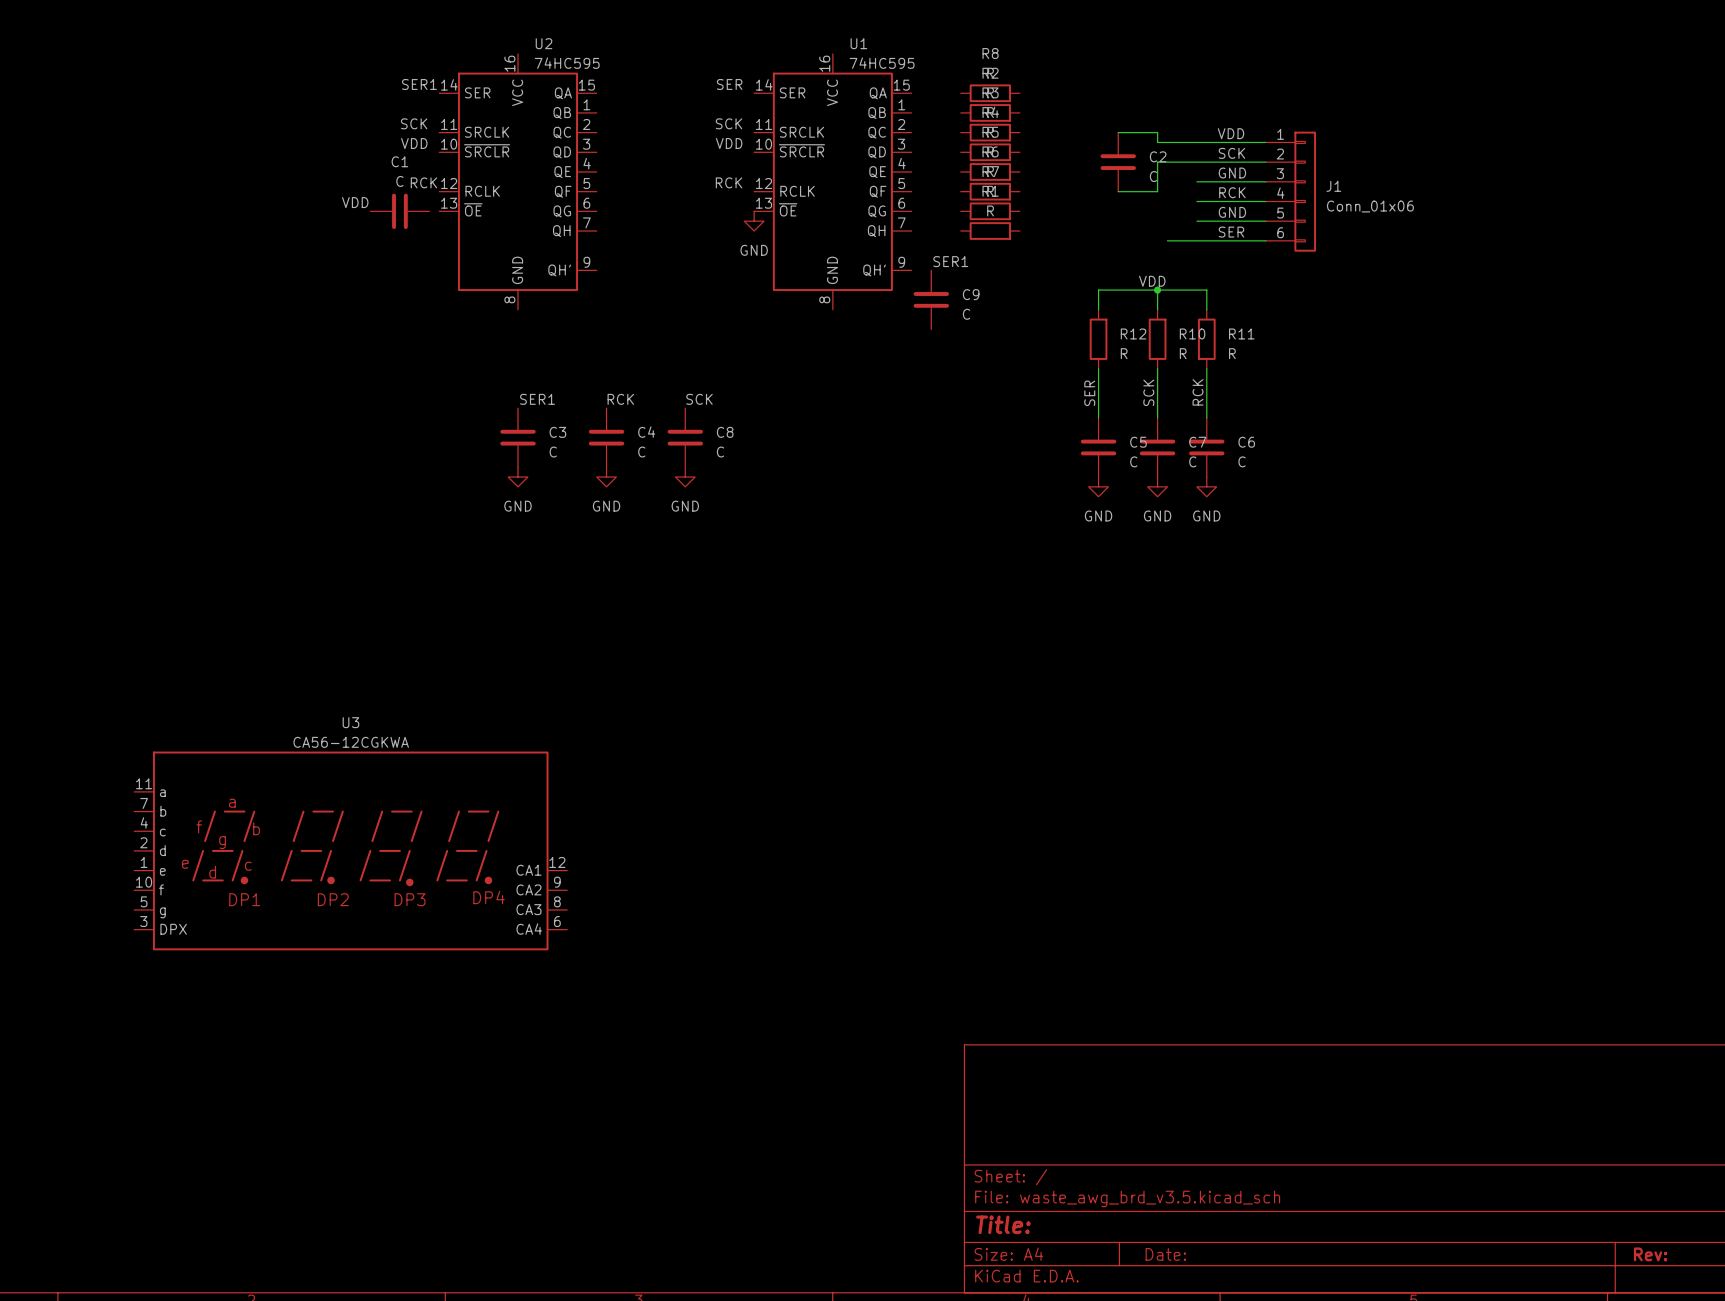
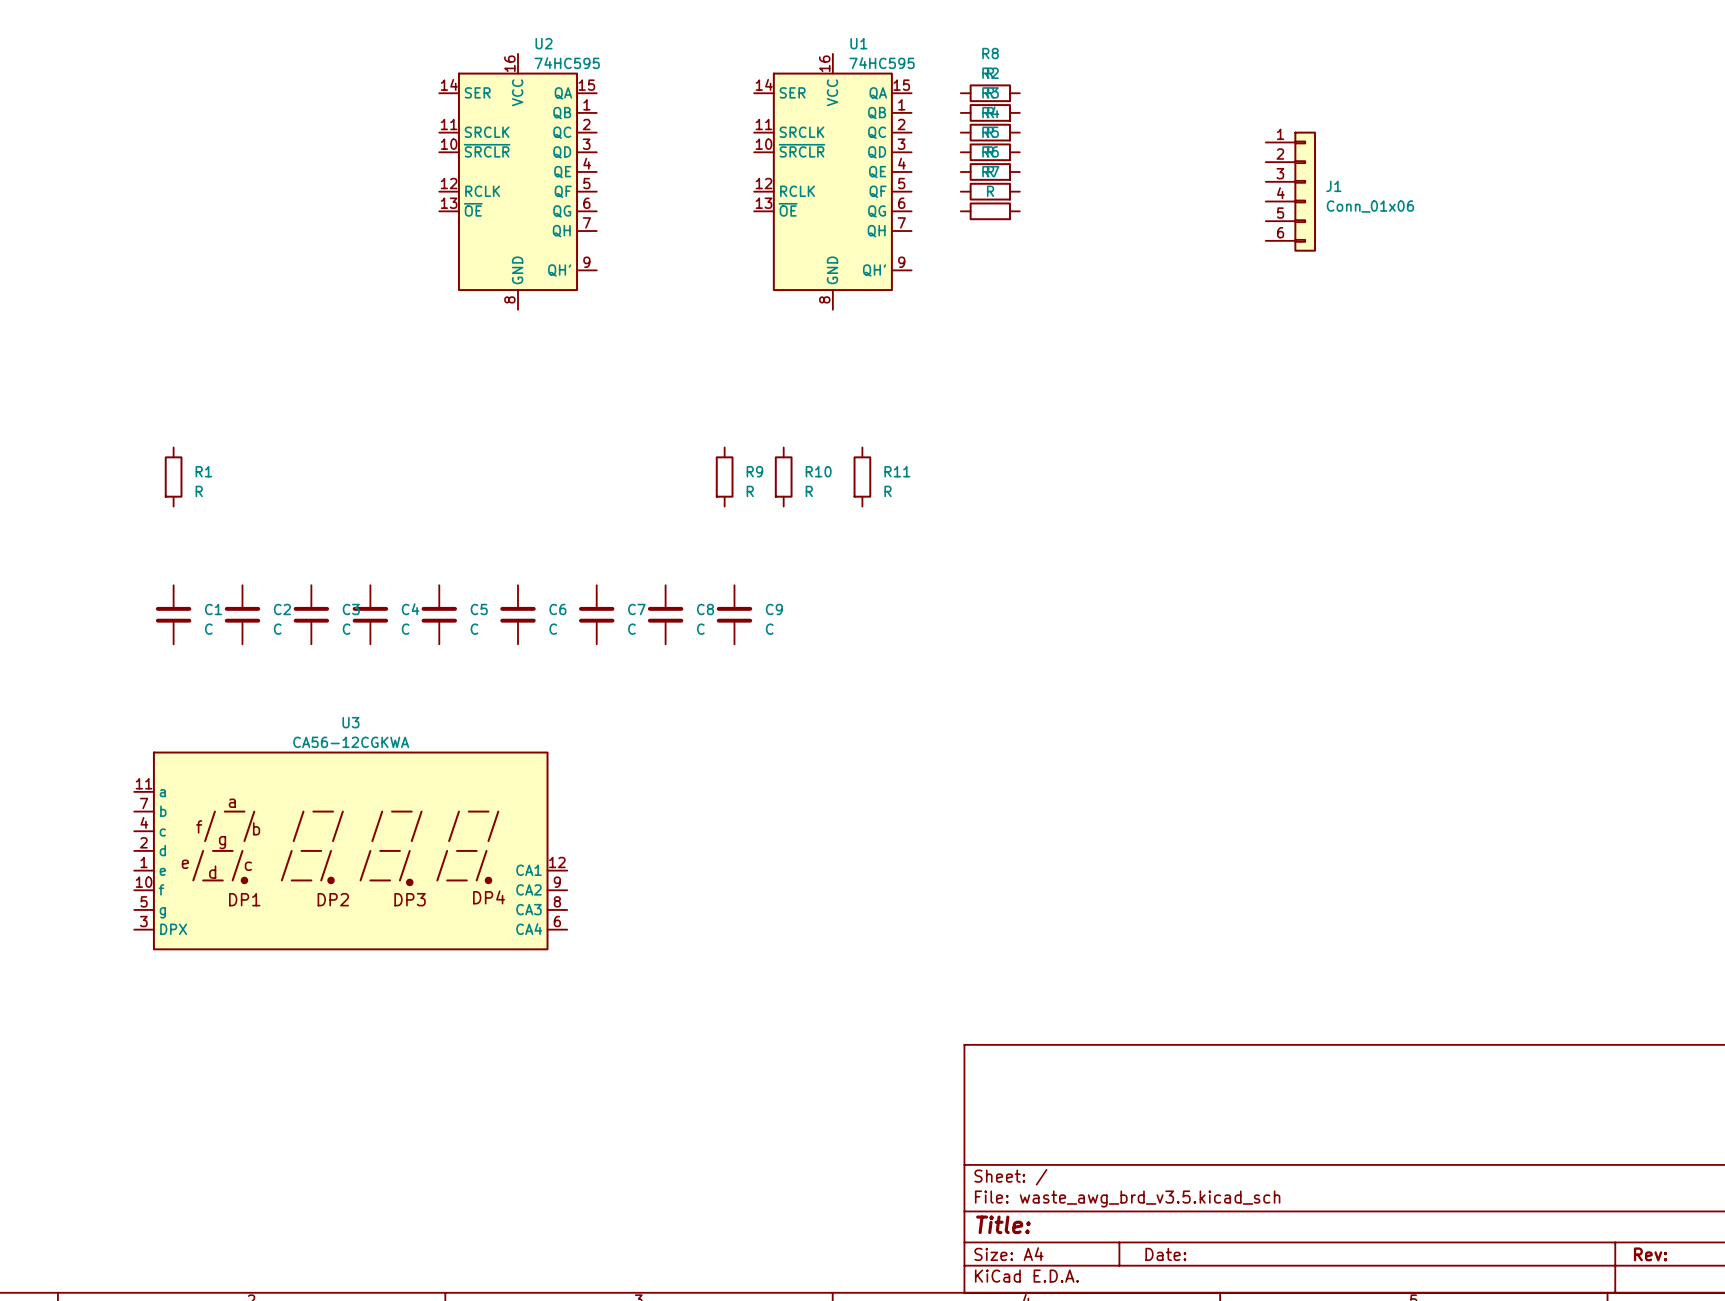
label: SER1 (419, 84) -> none
label: SER (729, 84) -> none
label: SCK (414, 123) -> none
label: SCK (729, 123) -> none
wire: (1118, 132) (1157, 132) (1157, 142) (1265, 142) -> none
label: VDD (1231, 133) -> none
label: VDD (414, 143) -> none
label: VDD (729, 143) -> none
label: SCK (1231, 153) -> none
C2 position: (1118, 162) -> (242, 614)
wire: (1265, 162) (1157, 162) (1157, 191) (1118, 191) -> none
label: GND (1232, 173) -> none
C1 value position: C (399, 181) -> C (208, 629)
wire: (1196, 181) (1265, 181) -> none
label: RCK (423, 182) -> none
label: RCK (729, 182) -> none
label: RCK (1232, 192) -> none
wire: (1196, 201) (1265, 201) -> none
label: VDD (355, 202) -> none
R1 value position: R (990, 210) -> R (199, 491)
C1 rotation: 0° (399, 211) -> 90° clockwise (173, 614)
C1 position: (399, 211) -> (173, 614)
label: GND (1232, 212) -> none
power symbol: GND (754, 221) -> none
wire: (1196, 221) (1265, 221) -> none
R1 rotation: 0° (990, 231) -> 90° clockwise (173, 477)
R1 position: (990, 231) -> (173, 477)
label: SER (1231, 232) -> none
wire: (1167, 240) (1265, 240) -> none
label: SER1 (950, 261) -> none
label: VDD (1152, 281) -> none
wire: (1157, 290) (1157, 309) -> none
junction: (1157, 290) -> none
C9 position: (931, 299) -> (734, 614)
wire: (1098, 309) (1098, 290) (1206, 290) (1206, 309) -> none
R12: R (1098, 339) -> none
R10 position: (1157, 339) -> (783, 477)
R11 position: (1206, 339) -> (862, 477)
wire: (1098, 368) (1098, 417) -> none
wire: (1157, 368) (1157, 417) -> none
wire: (1206, 368) (1206, 417) -> none
label: SCK (1148, 392) -> none
label: RCK (1198, 392) -> none
label: SER (1089, 393) -> none
label: SER1 (537, 399) -> none
label: RCK (620, 399) -> none
label: SCK (699, 399) -> none
C3 position: (518, 437) -> (311, 614)
C4 position: (606, 437) -> (370, 614)
C8 position: (685, 437) -> (665, 614)
C5 position: (1098, 447) -> (439, 614)
C7 position: (1157, 447) -> (596, 614)
C6 position: (1206, 447) -> (518, 614)
power symbol: GND (518, 477) -> none
power symbol: GND (606, 477) -> none
power symbol: GND (685, 477) -> none
R9: none -> R (724, 477)
power symbol: GND (1098, 486) -> none
power symbol: GND (1157, 486) -> none
power symbol: GND (1206, 486) -> none

